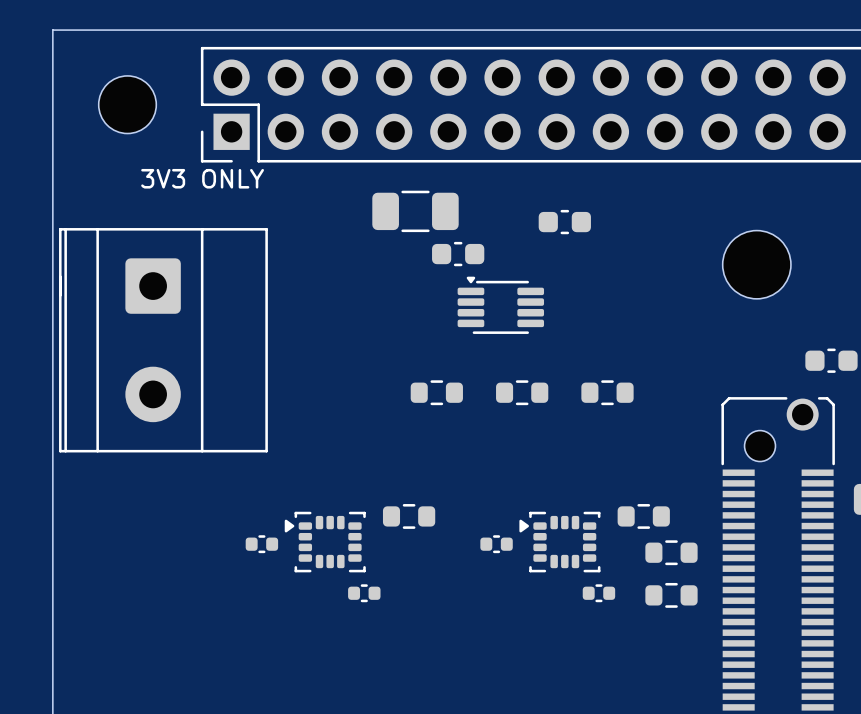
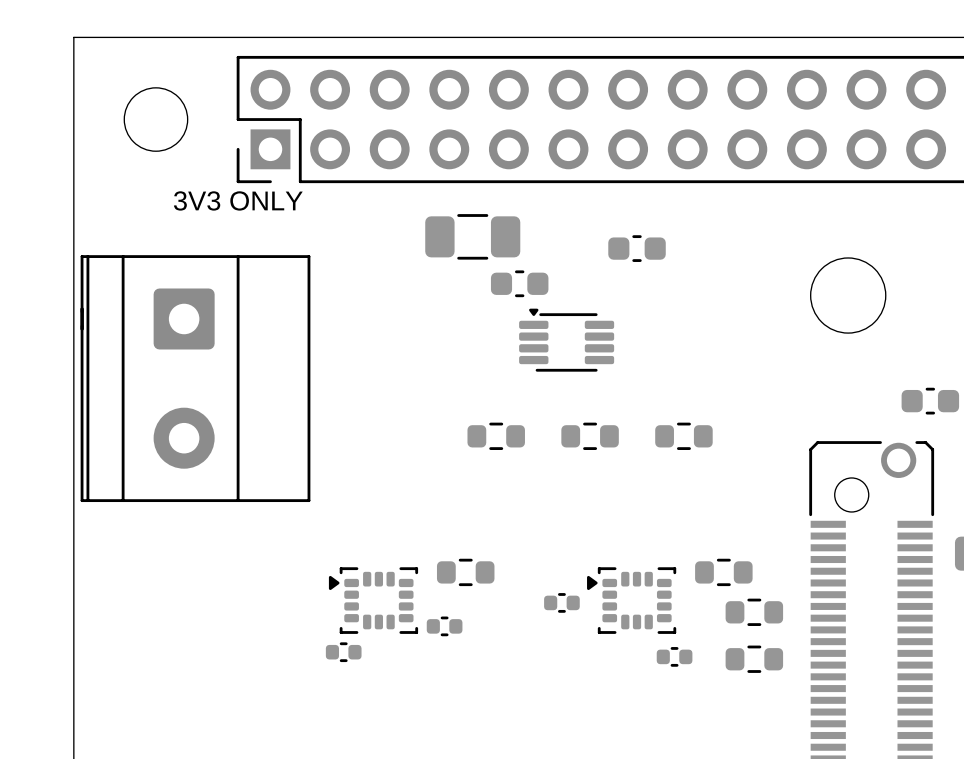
part: (261, 544) -> none
part: none -> (444, 626)
part: none -> (343, 652)
part: (364, 593) -> none

